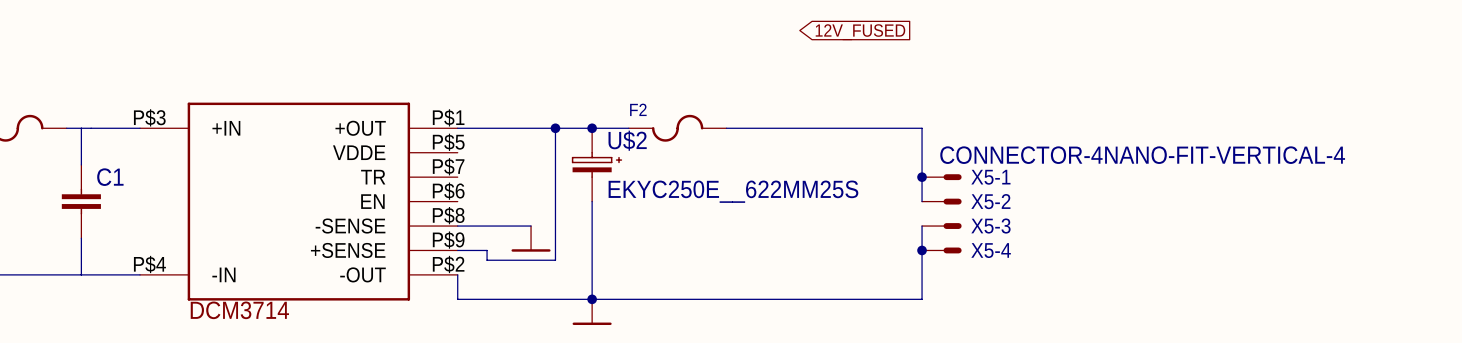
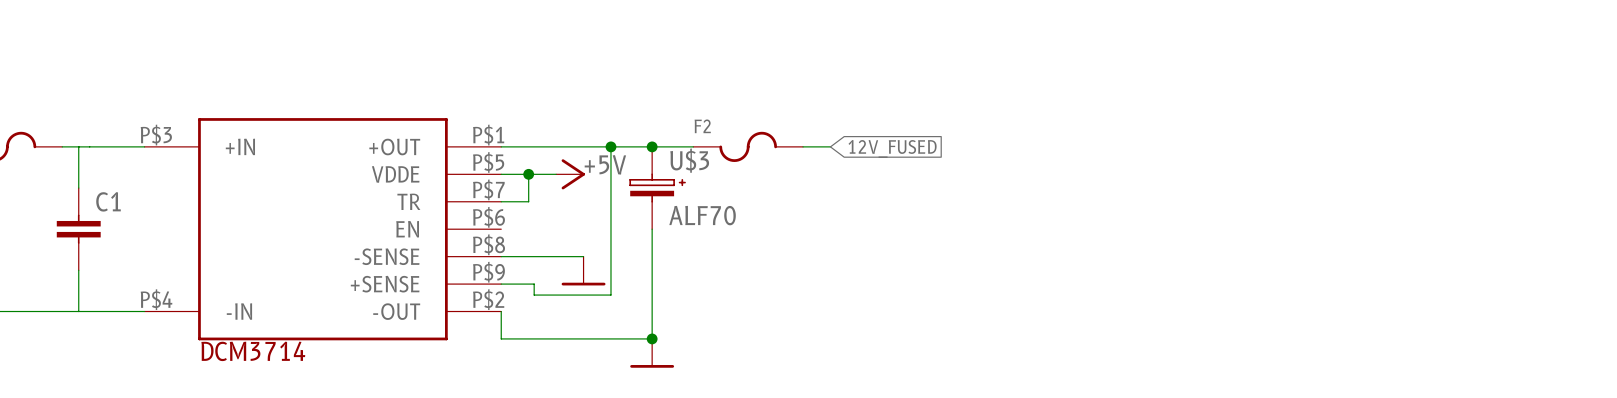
global label position: 12V_FUSED (860, 32) -> 12V_FUSED (892, 148)
wire: (750, 128) (922, 128) (922, 201) -> none
U$2 name: U$2 (627, 140) -> U$3 (689, 160)
wire: none -> (501, 174) (556, 174)
wire: none -> (528, 174) (528, 201) (501, 201)
junction: none -> (528, 174)
power symbol: none -> +5V (570, 174)
junction: (922, 177) -> none
X5-1: CONNECTOR-4NANO-FIT-VERTICAL-4 (941, 177) -> none
U$2 value: EKYC250E__622MM25S (733, 191) -> ALF70 (702, 215)
X5-2: (941, 201) -> none
wire: (922, 226) (922, 299) (592, 299) -> none
X5-3: (941, 226) -> none
junction: (922, 250) -> none
X5-4: (941, 250) -> none

